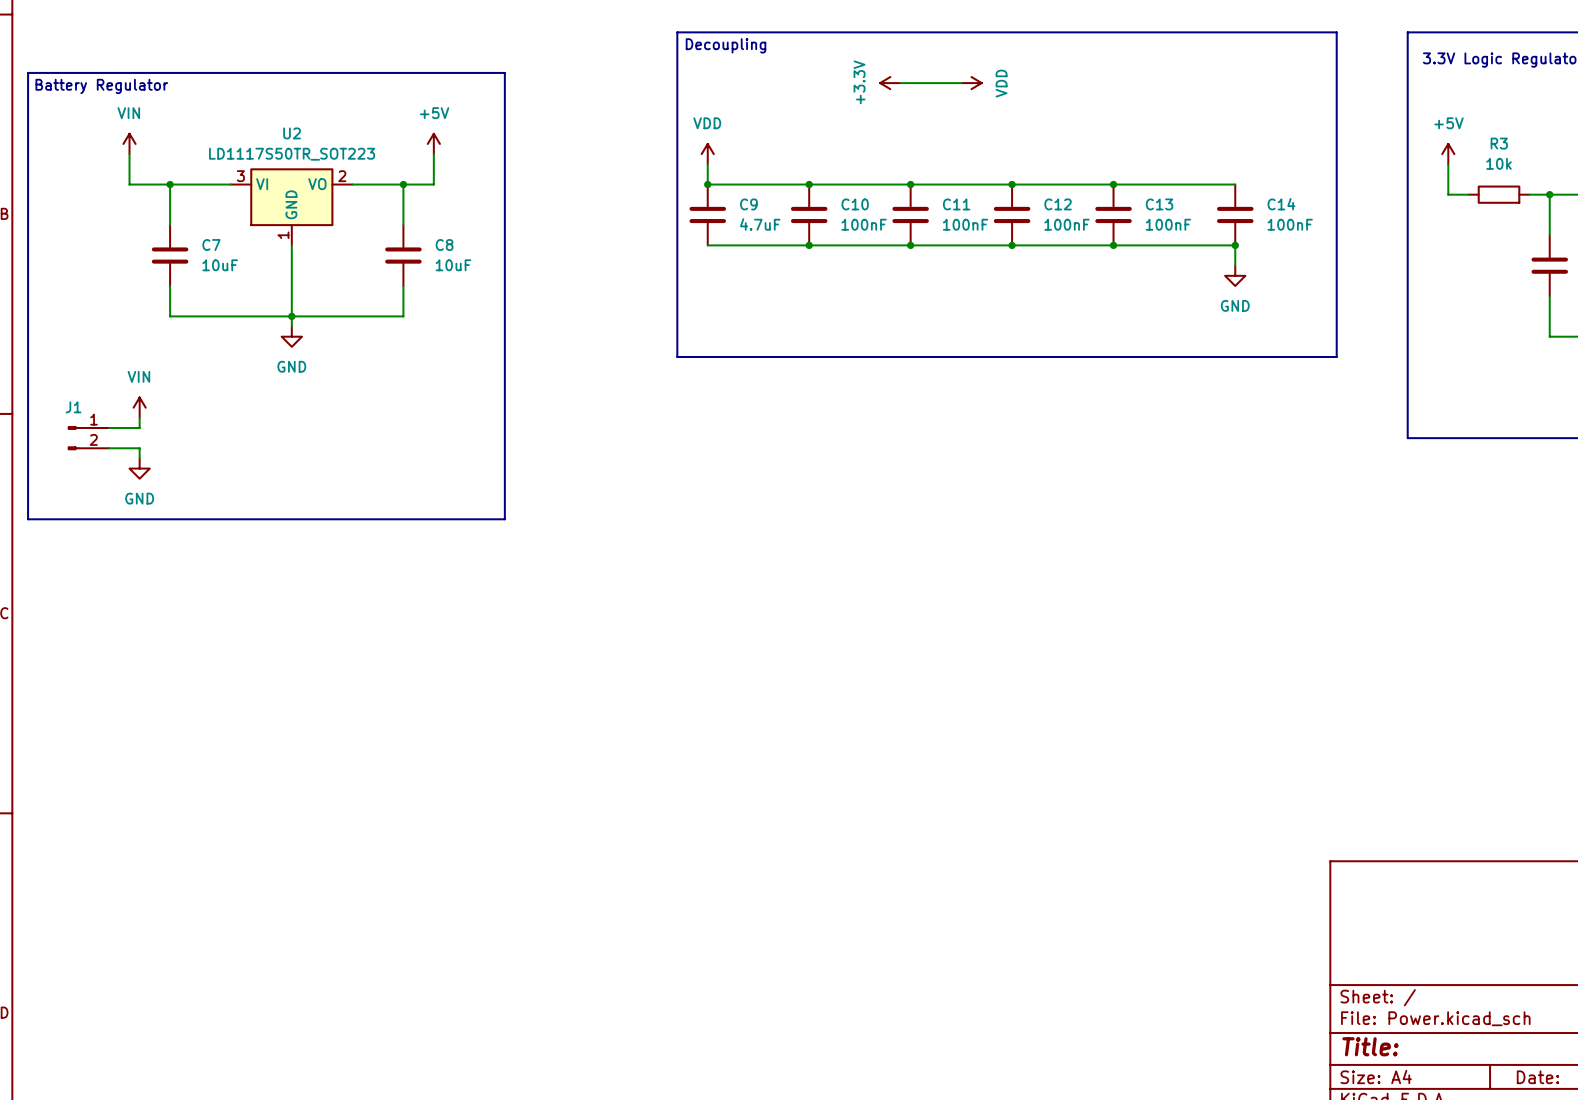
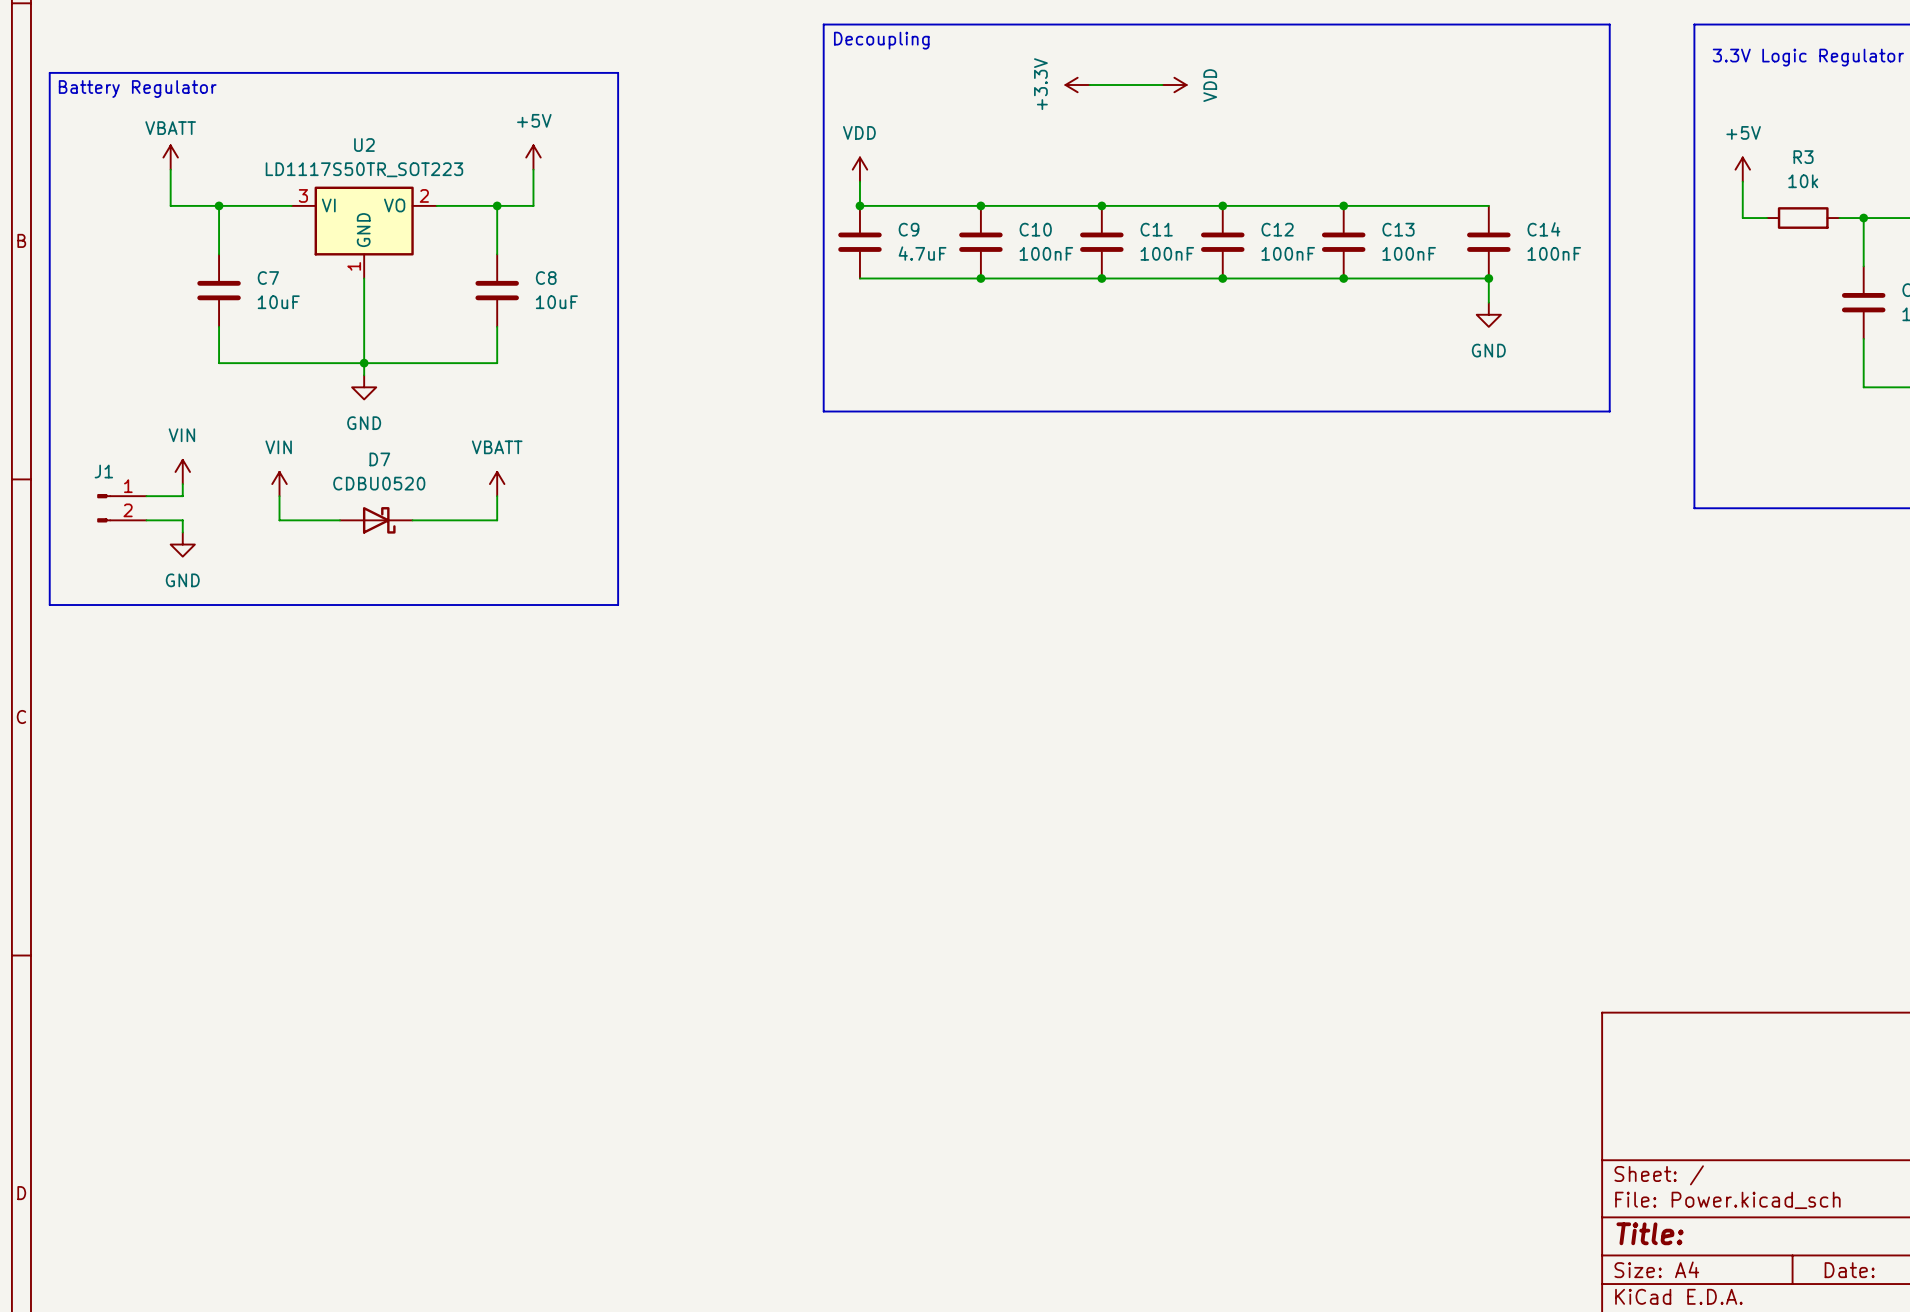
power symbol: VIN (129, 143) -> VBATT (170, 157)
power symbol: none -> VIN (279, 484)
power symbol: none -> VBATT (497, 484)
wire: none -> (279, 496) (279, 520) (339, 520)
wire: none -> (497, 496) (497, 520) (412, 520)
D7: none -> CDBU0520 (376, 520)

